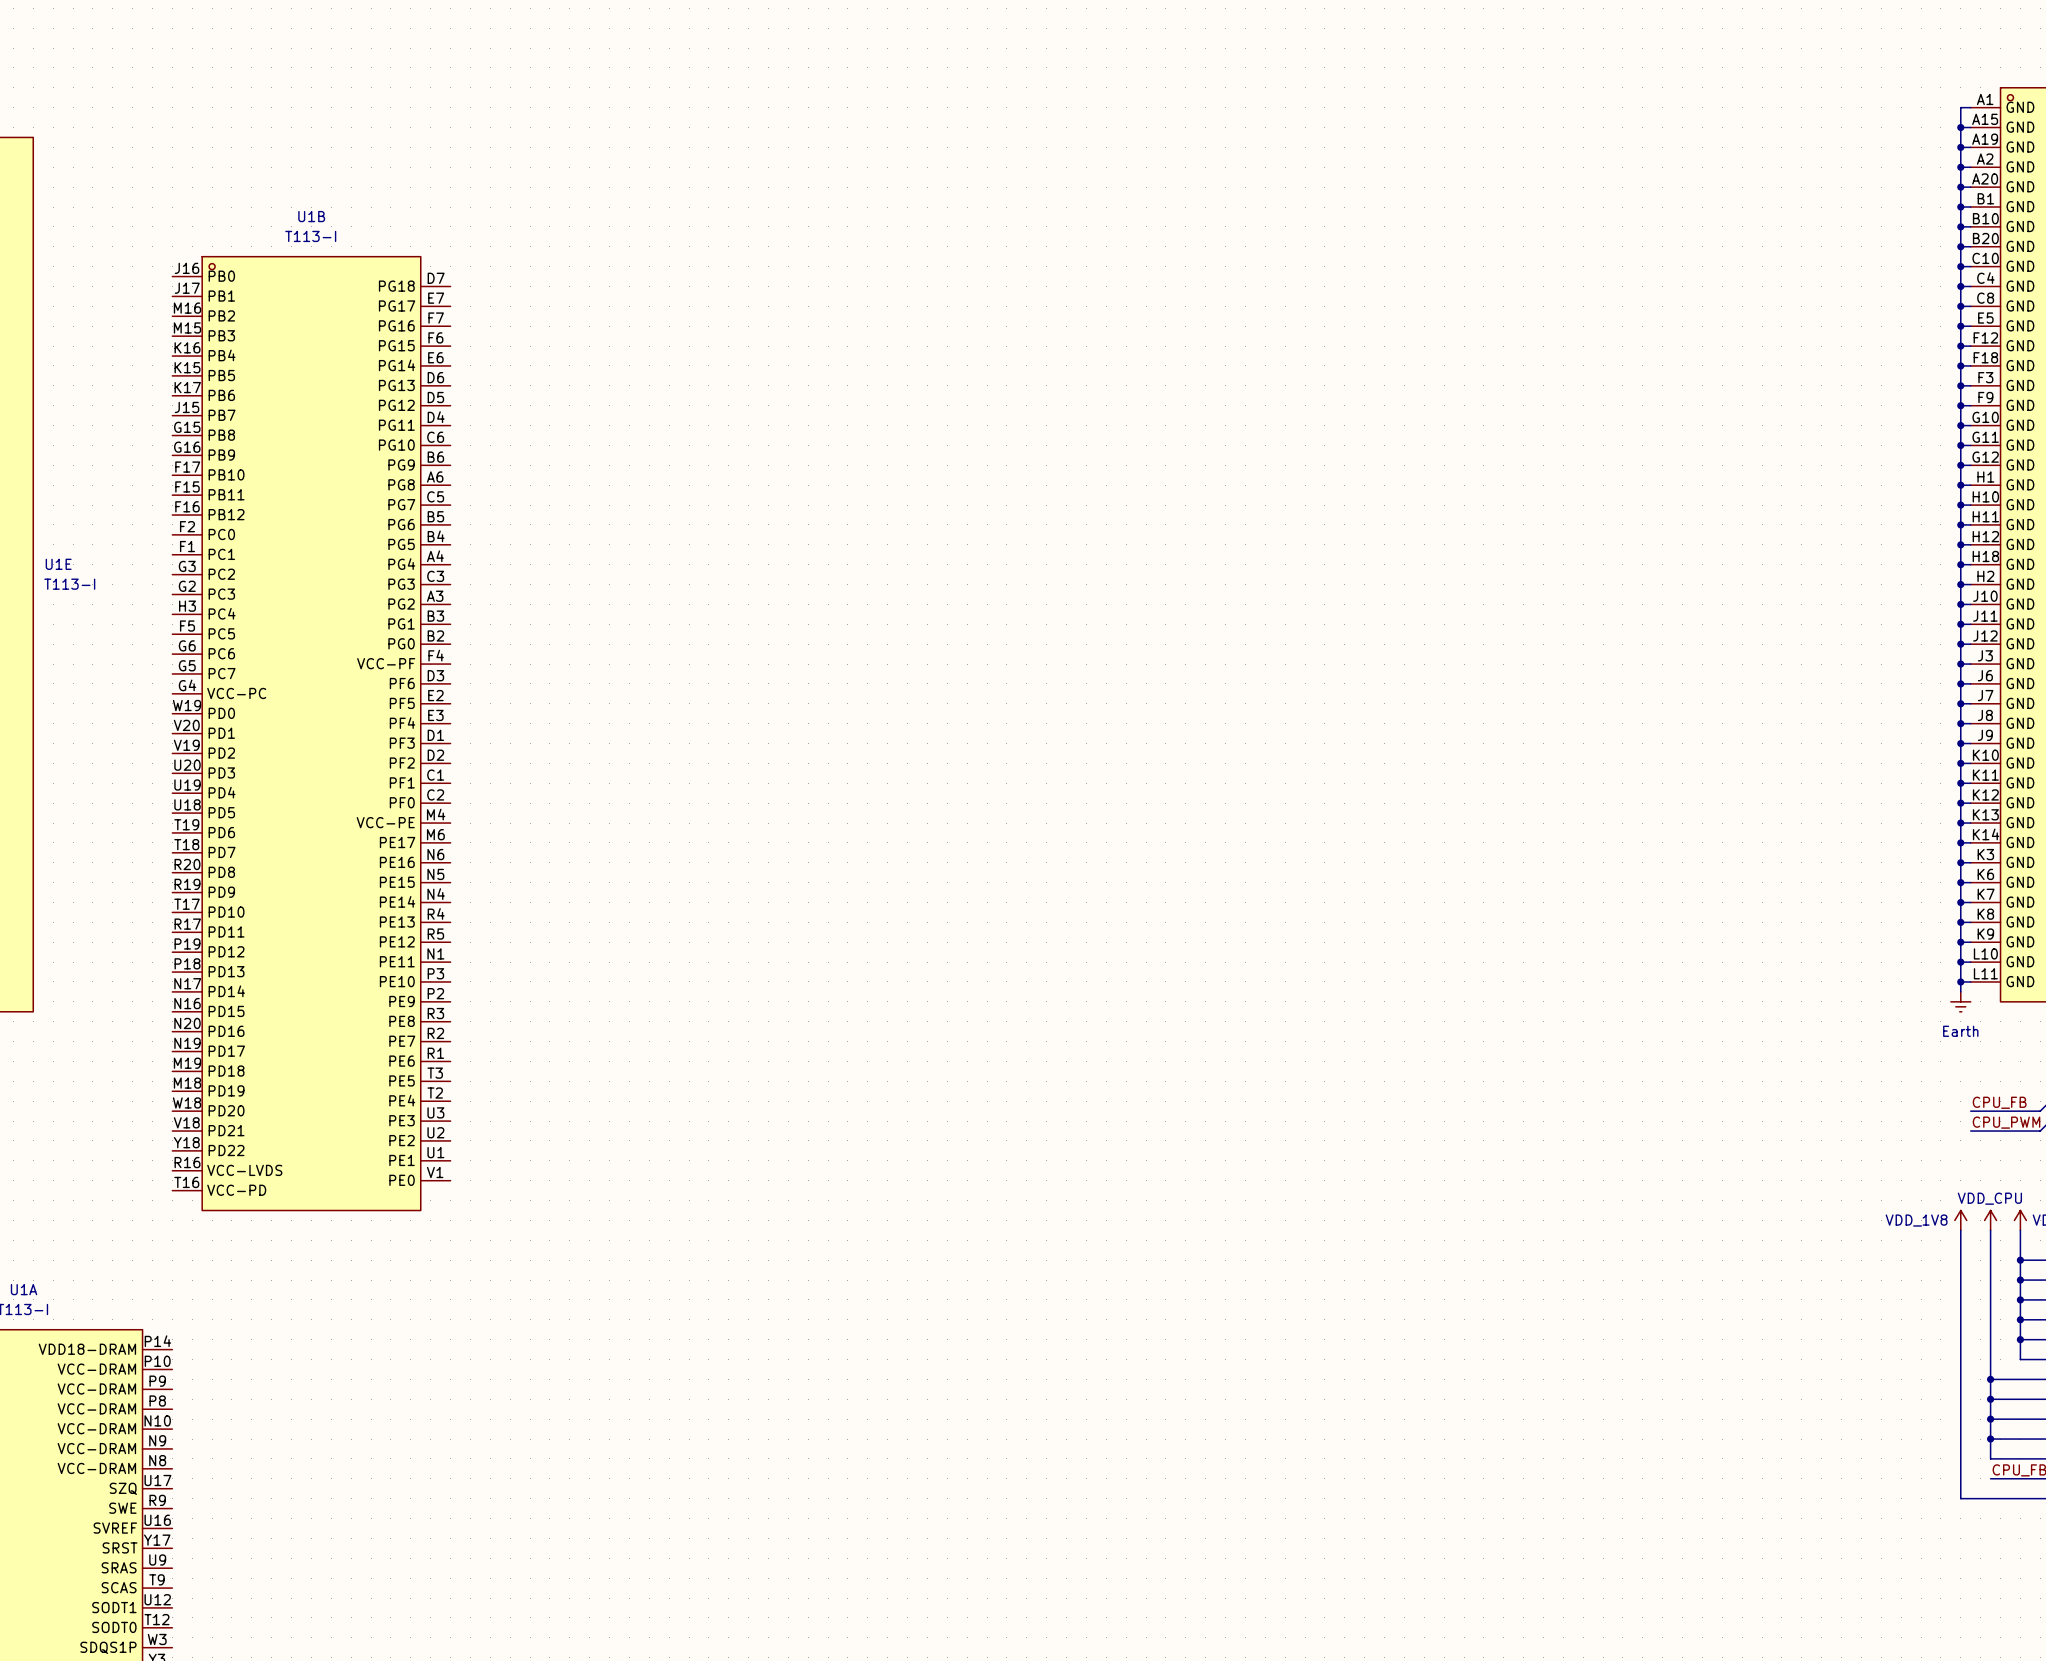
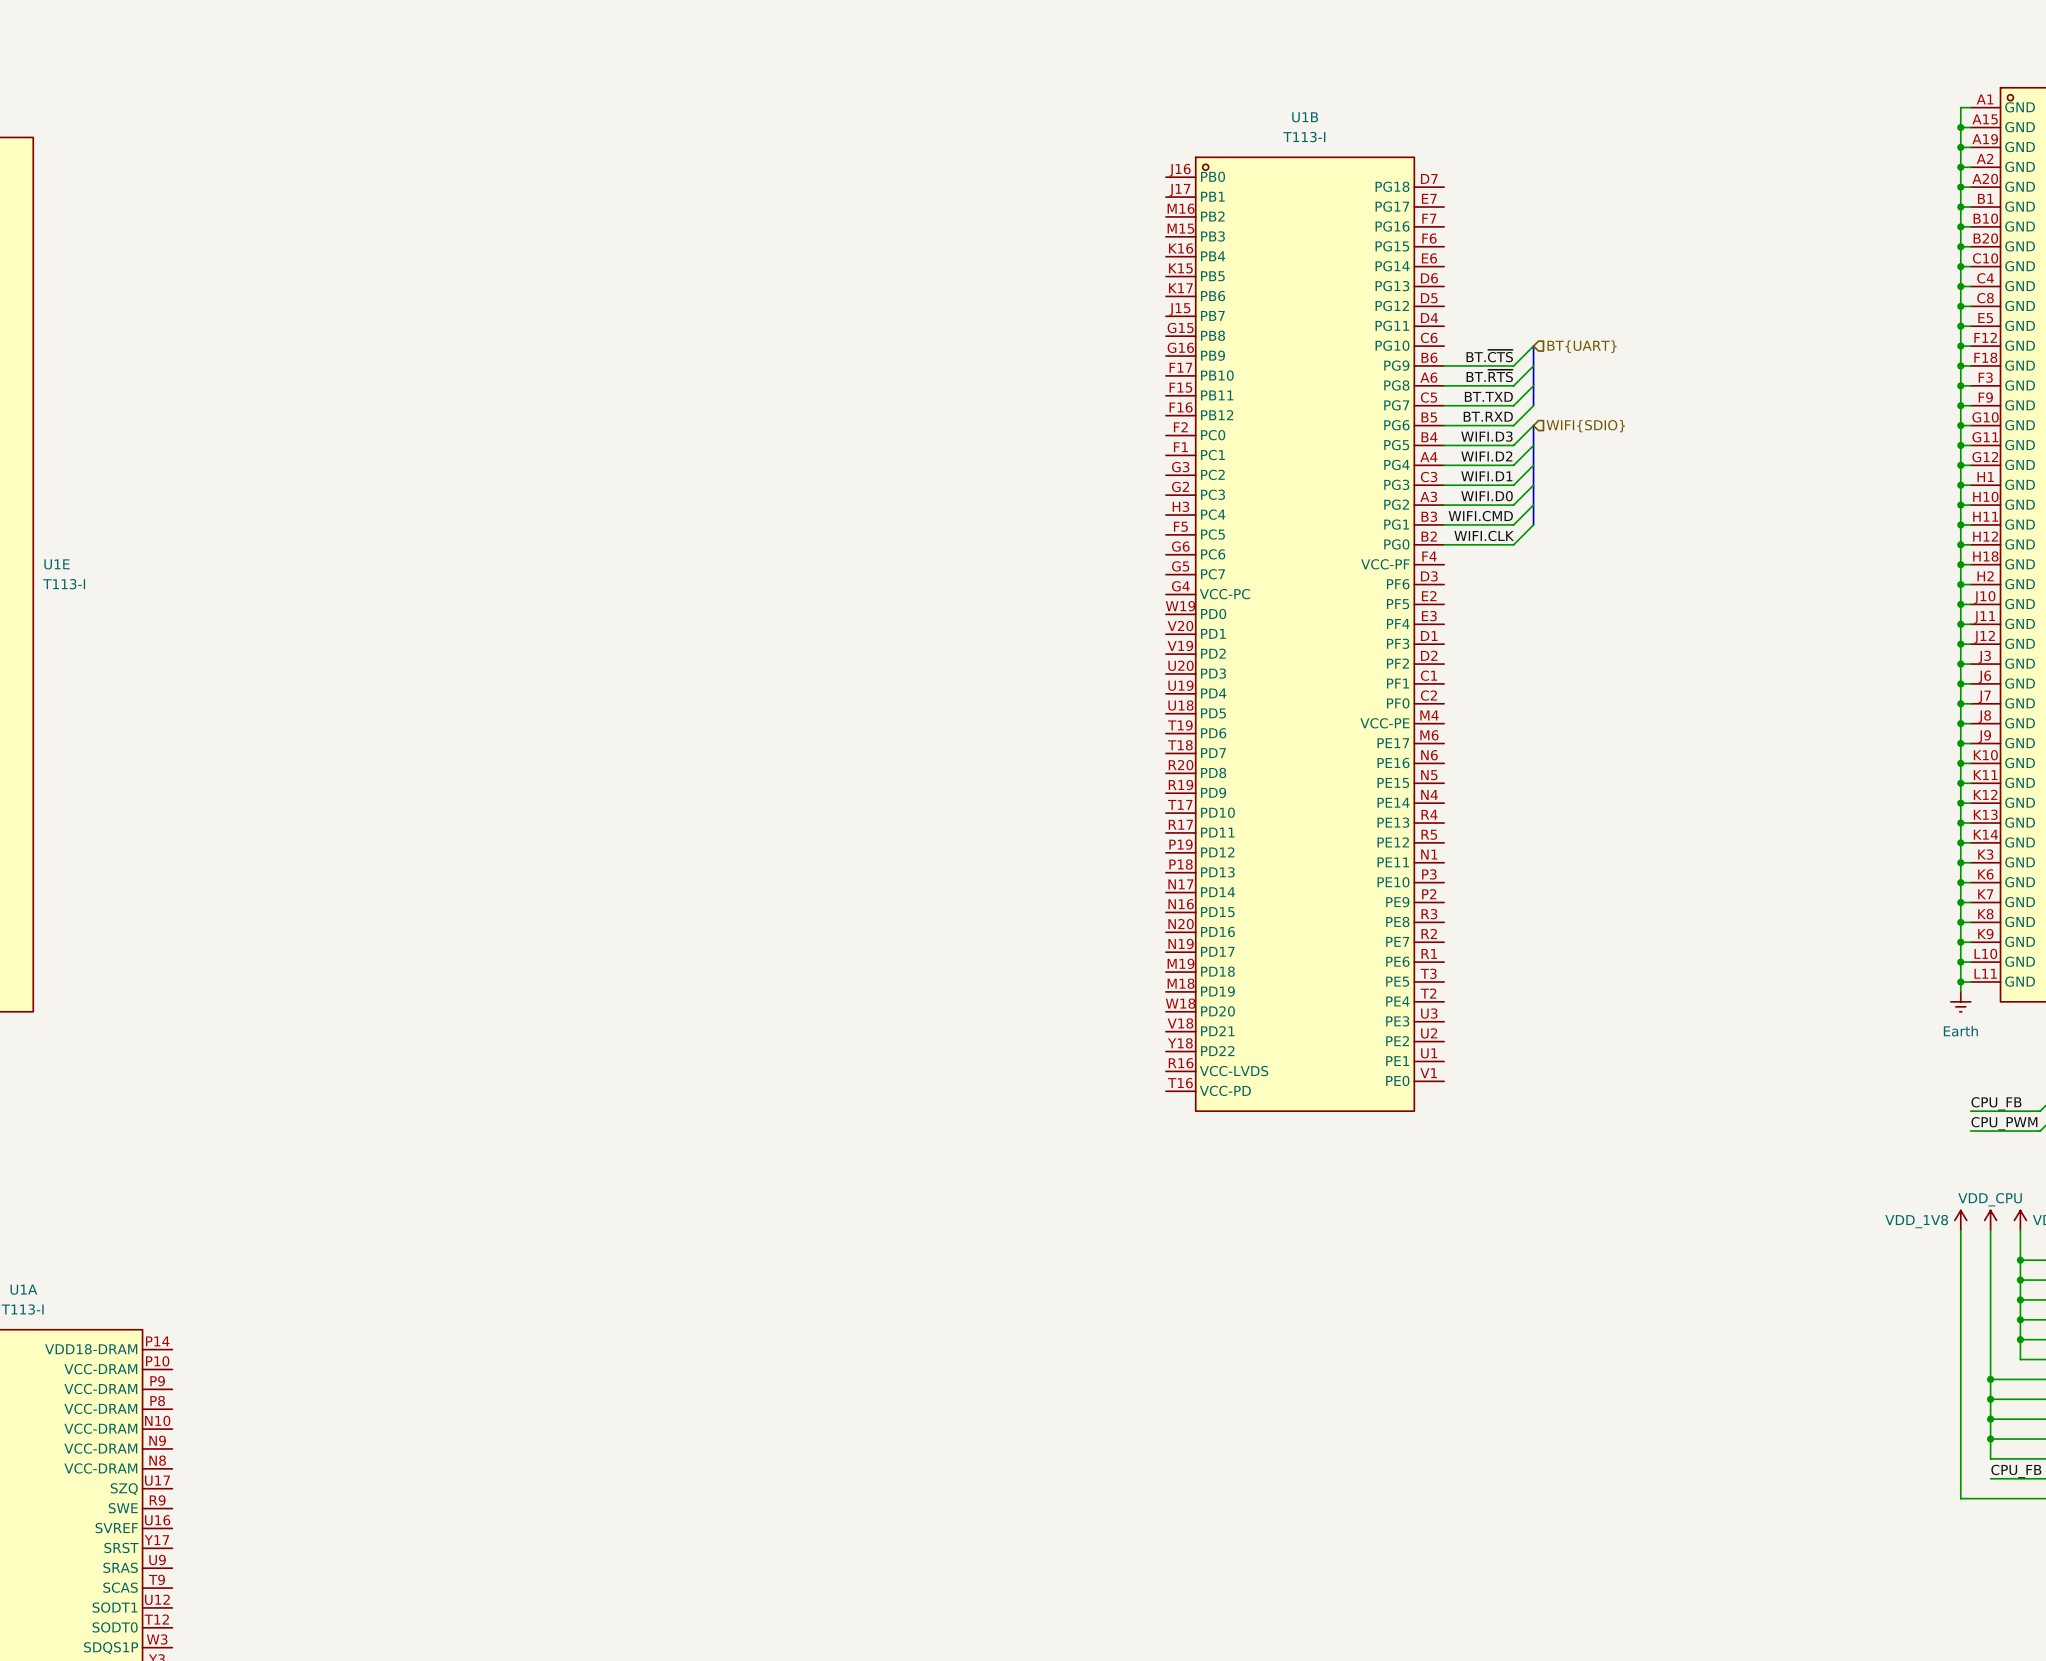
wire: none -> (1533, 346) (1513, 365) (1444, 365)
bus: none -> (1533, 346) (1533, 405)
hierarchical label: none -> BT{UART} (1582, 346)
label: none -> BT.~{CTS} (1489, 356)
wire: none -> (1533, 365) (1513, 385) (1444, 385)
label: none -> BT.~{RTS} (1489, 375)
wire: none -> (1533, 385) (1513, 405) (1444, 405)
label: none -> BT.TXD (1488, 396)
wire: none -> (1533, 405) (1513, 425) (1444, 425)
label: none -> BT.RXD (1488, 416)
wire: none -> (1533, 425) (1513, 445) (1444, 445)
bus: none -> (1533, 425) (1533, 524)
hierarchical label: none -> WIFI{SDIO} (1585, 426)
label: none -> WIFI.D3 (1486, 436)
wire: none -> (1533, 445) (1513, 465) (1444, 465)
label: none -> WIFI.D2 (1486, 456)
wire: none -> (1533, 465) (1513, 485) (1444, 485)
label: none -> WIFI.D1 (1486, 476)
wire: none -> (1533, 485) (1513, 505) (1444, 505)
label: none -> WIFI.D0 (1487, 496)
wire: none -> (1533, 505) (1513, 524) (1444, 524)
label: none -> WIFI.CMD (1480, 516)
wire: none -> (1533, 524) (1513, 544) (1444, 544)
label: none -> WIFI.CLK (1484, 535)
U1B position: (311, 733) -> (1305, 634)

